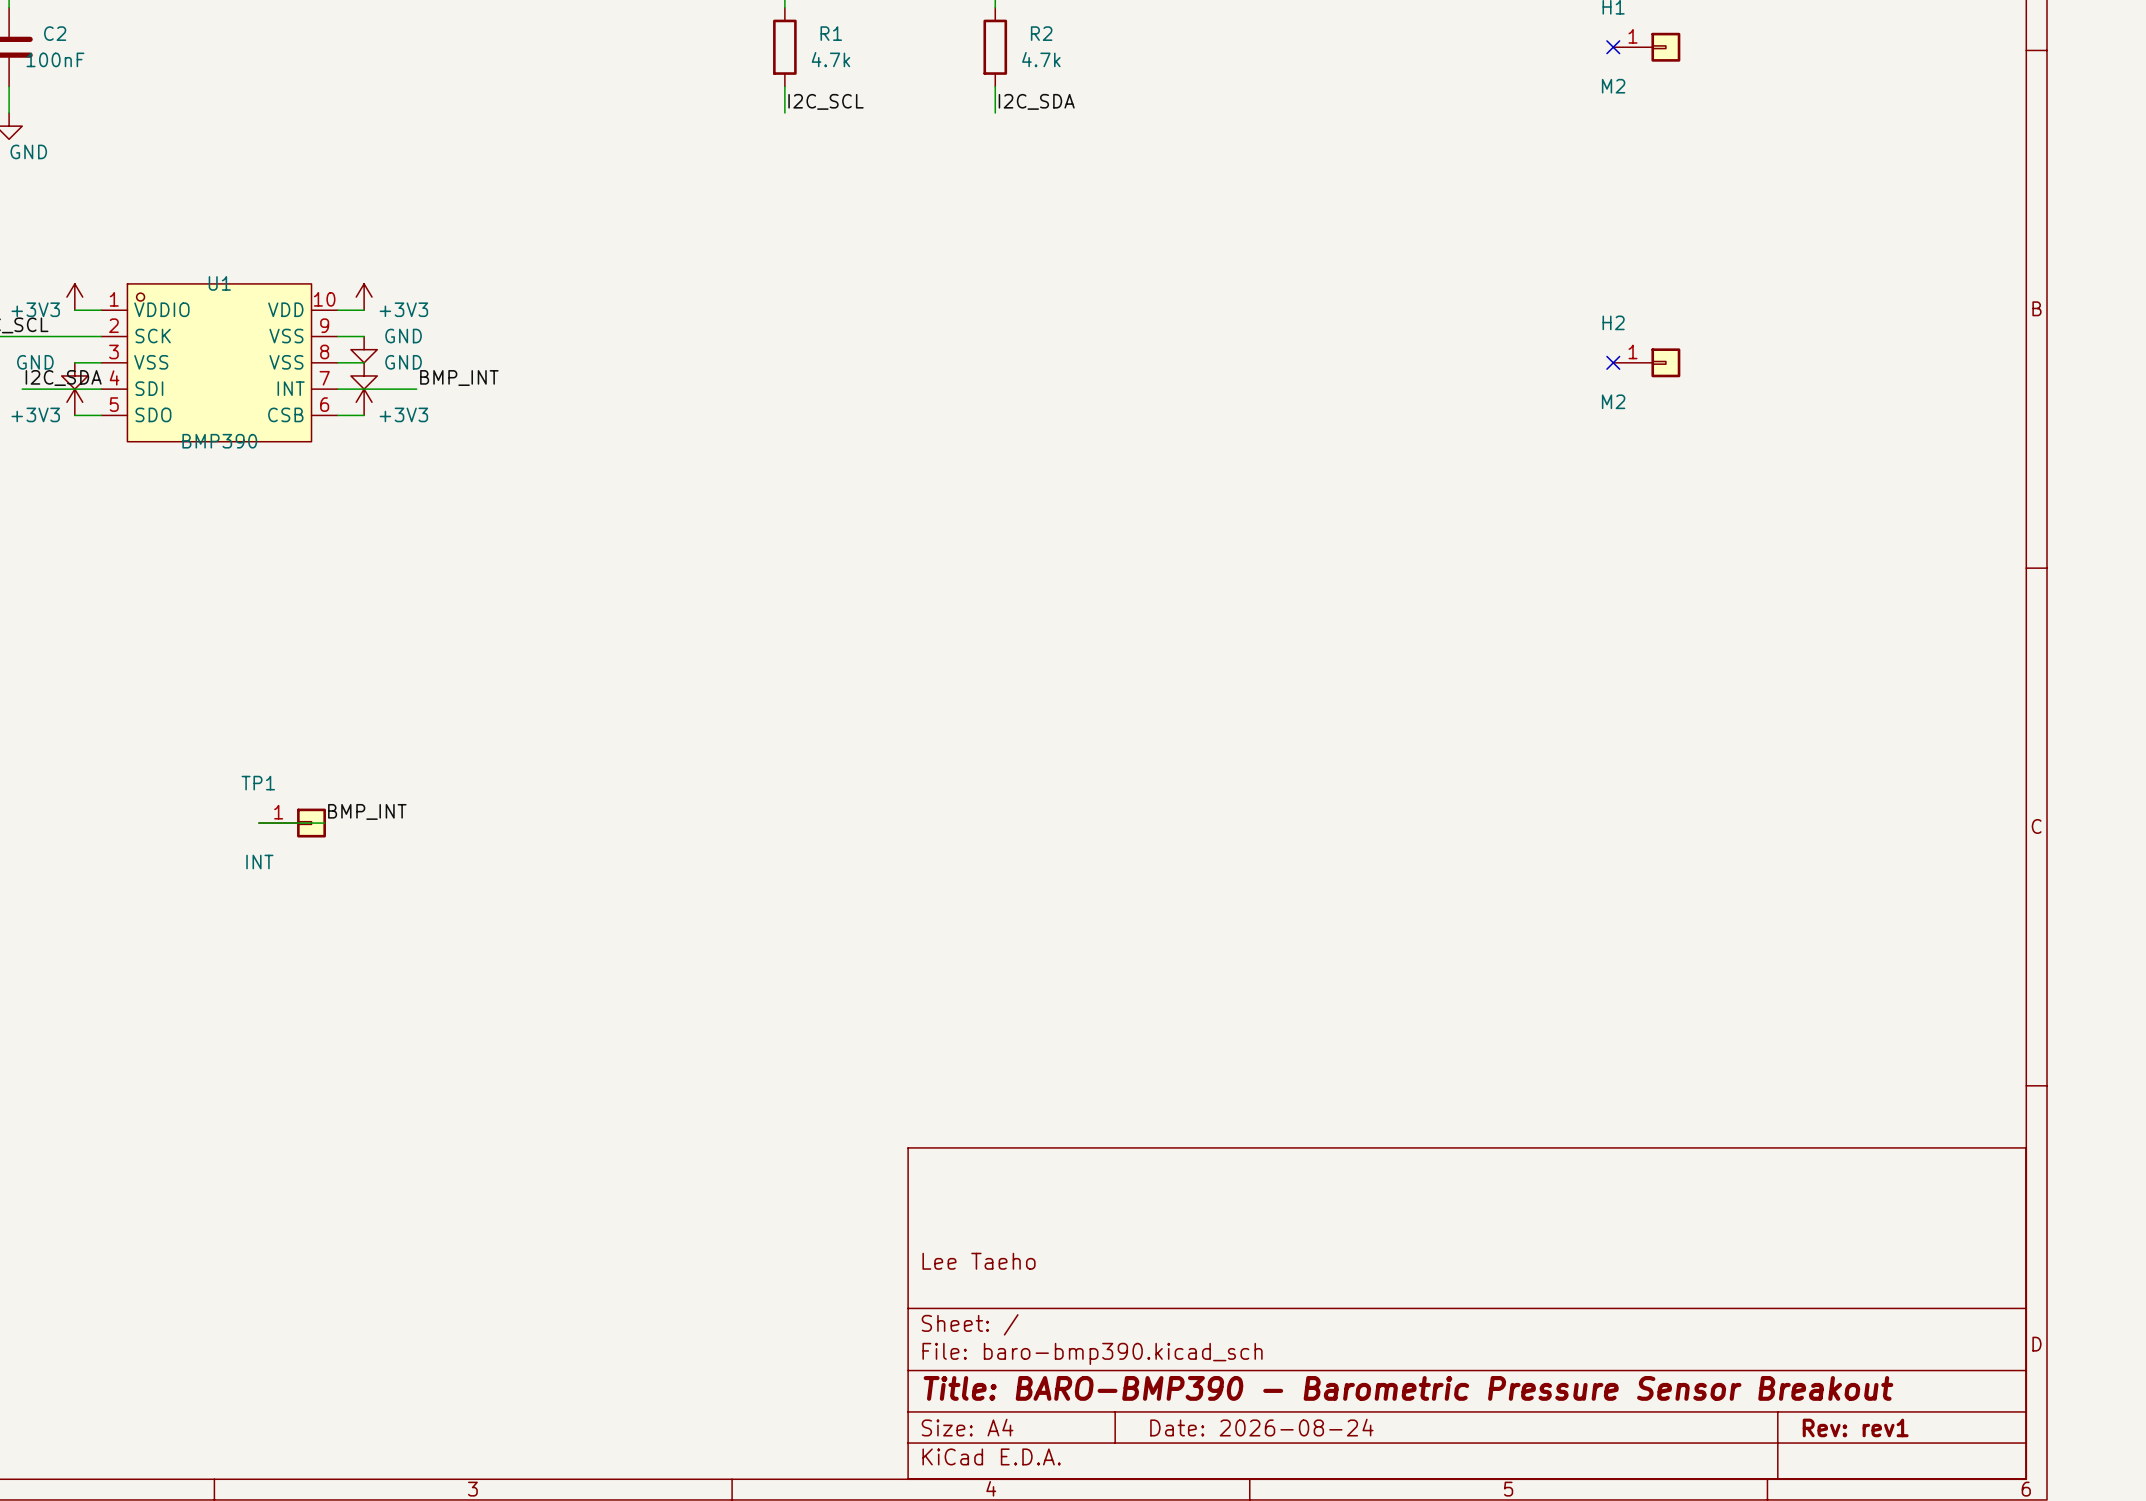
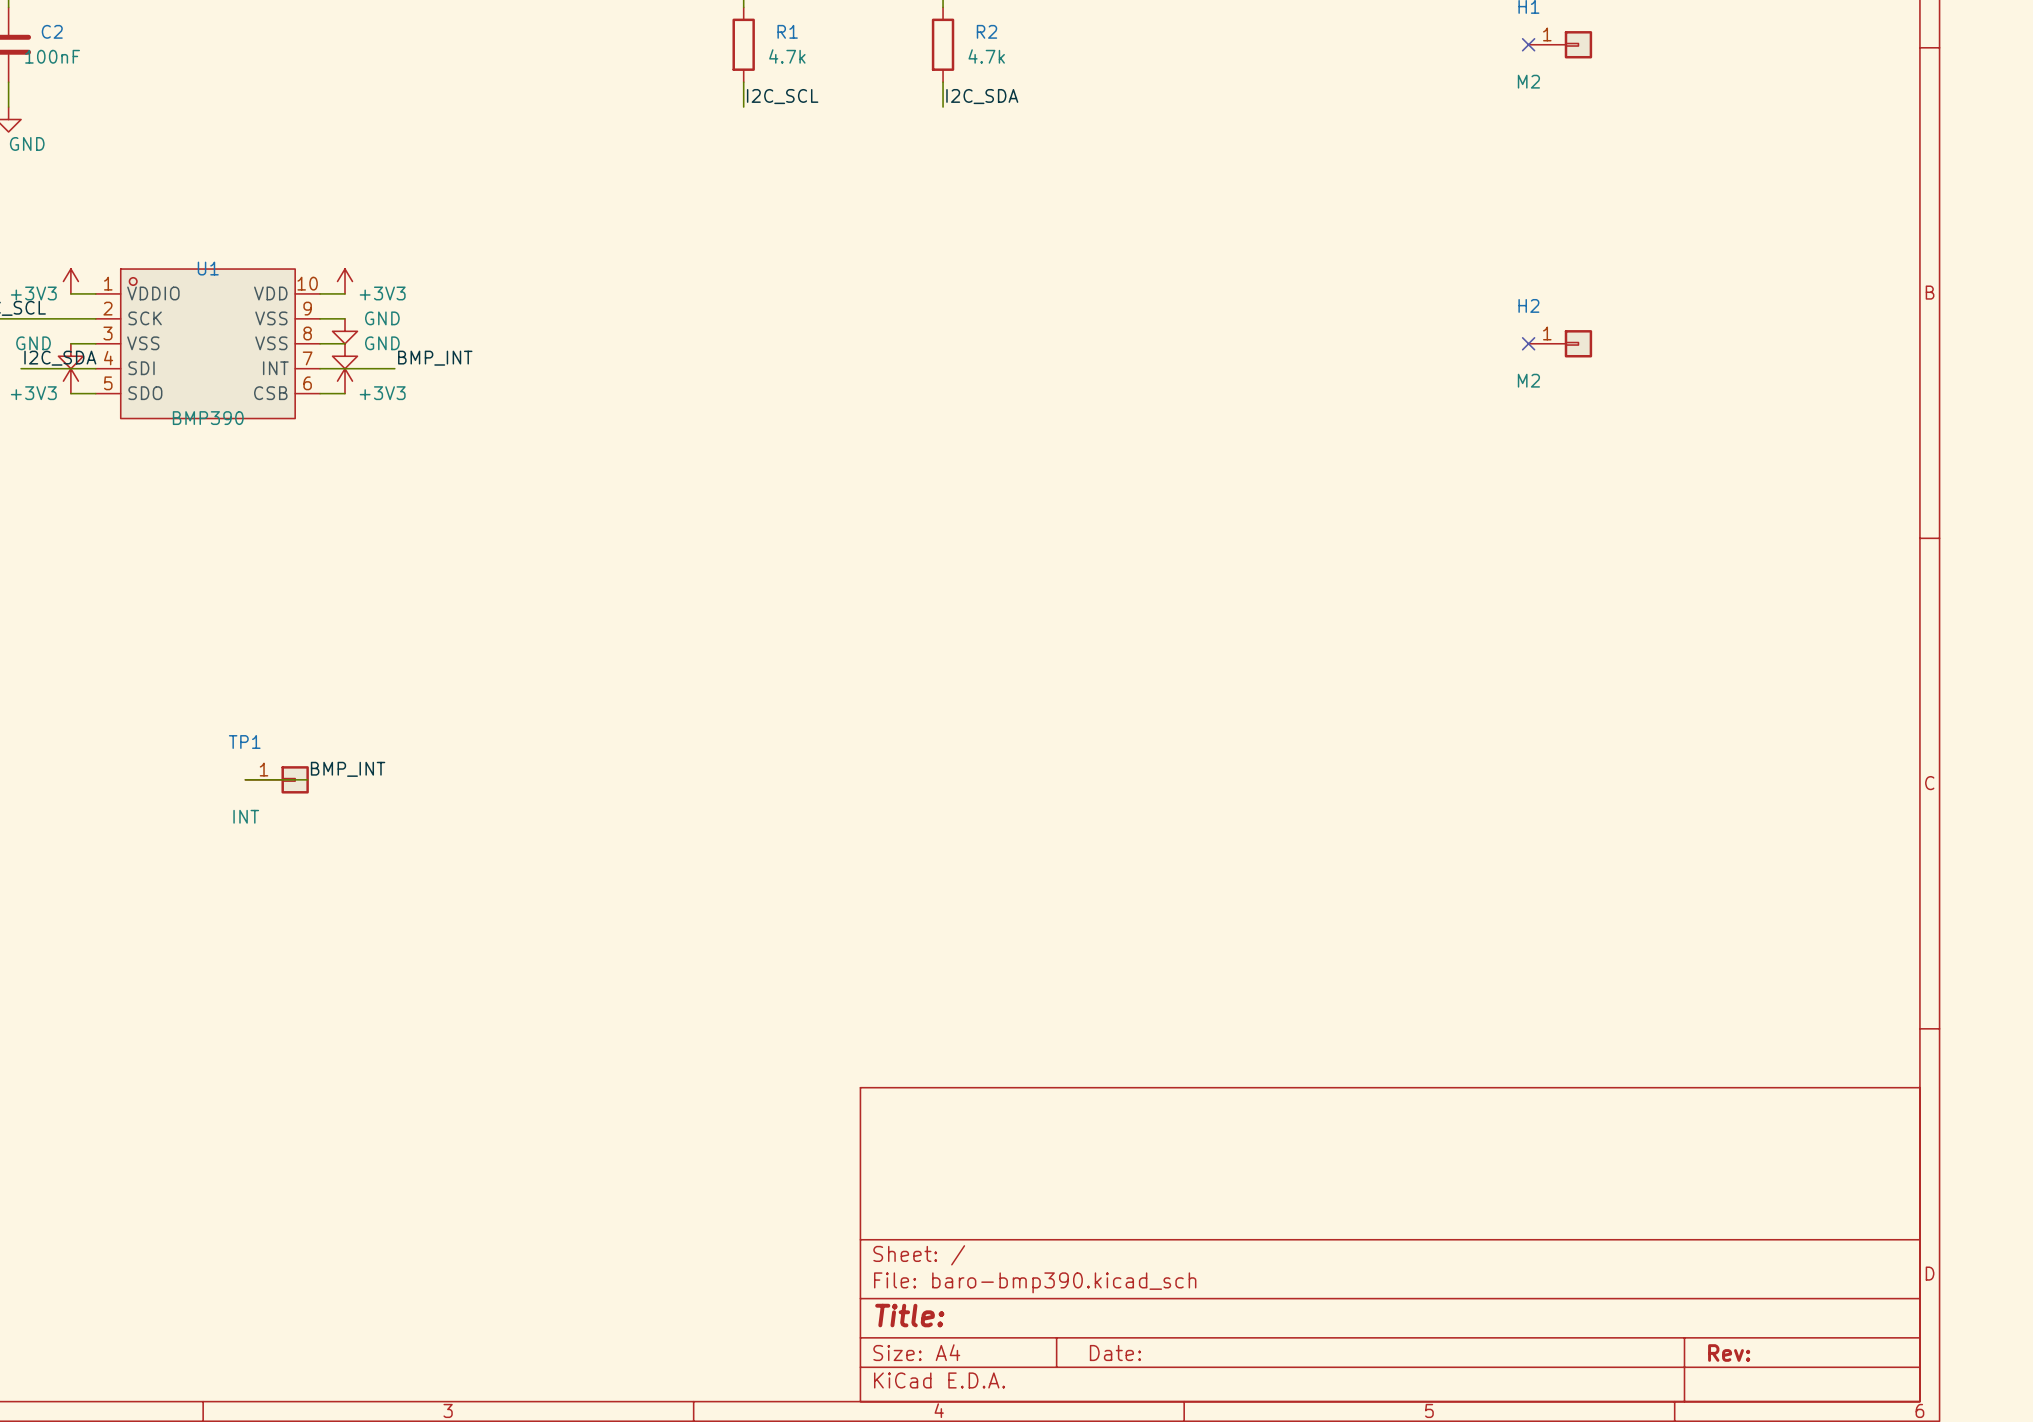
title block: Lee Taeho (979, 1261) -> none
title block: Title: BARO-BMP390 - Barometric Pressure Sensor Breakout (1408, 1388) -> Title: (909, 1315)
title block: Date: 2026-08-24 (1261, 1427) -> Date: (1115, 1353)
title block: Rev: rev1 (1855, 1427) -> Rev: (1729, 1353)

